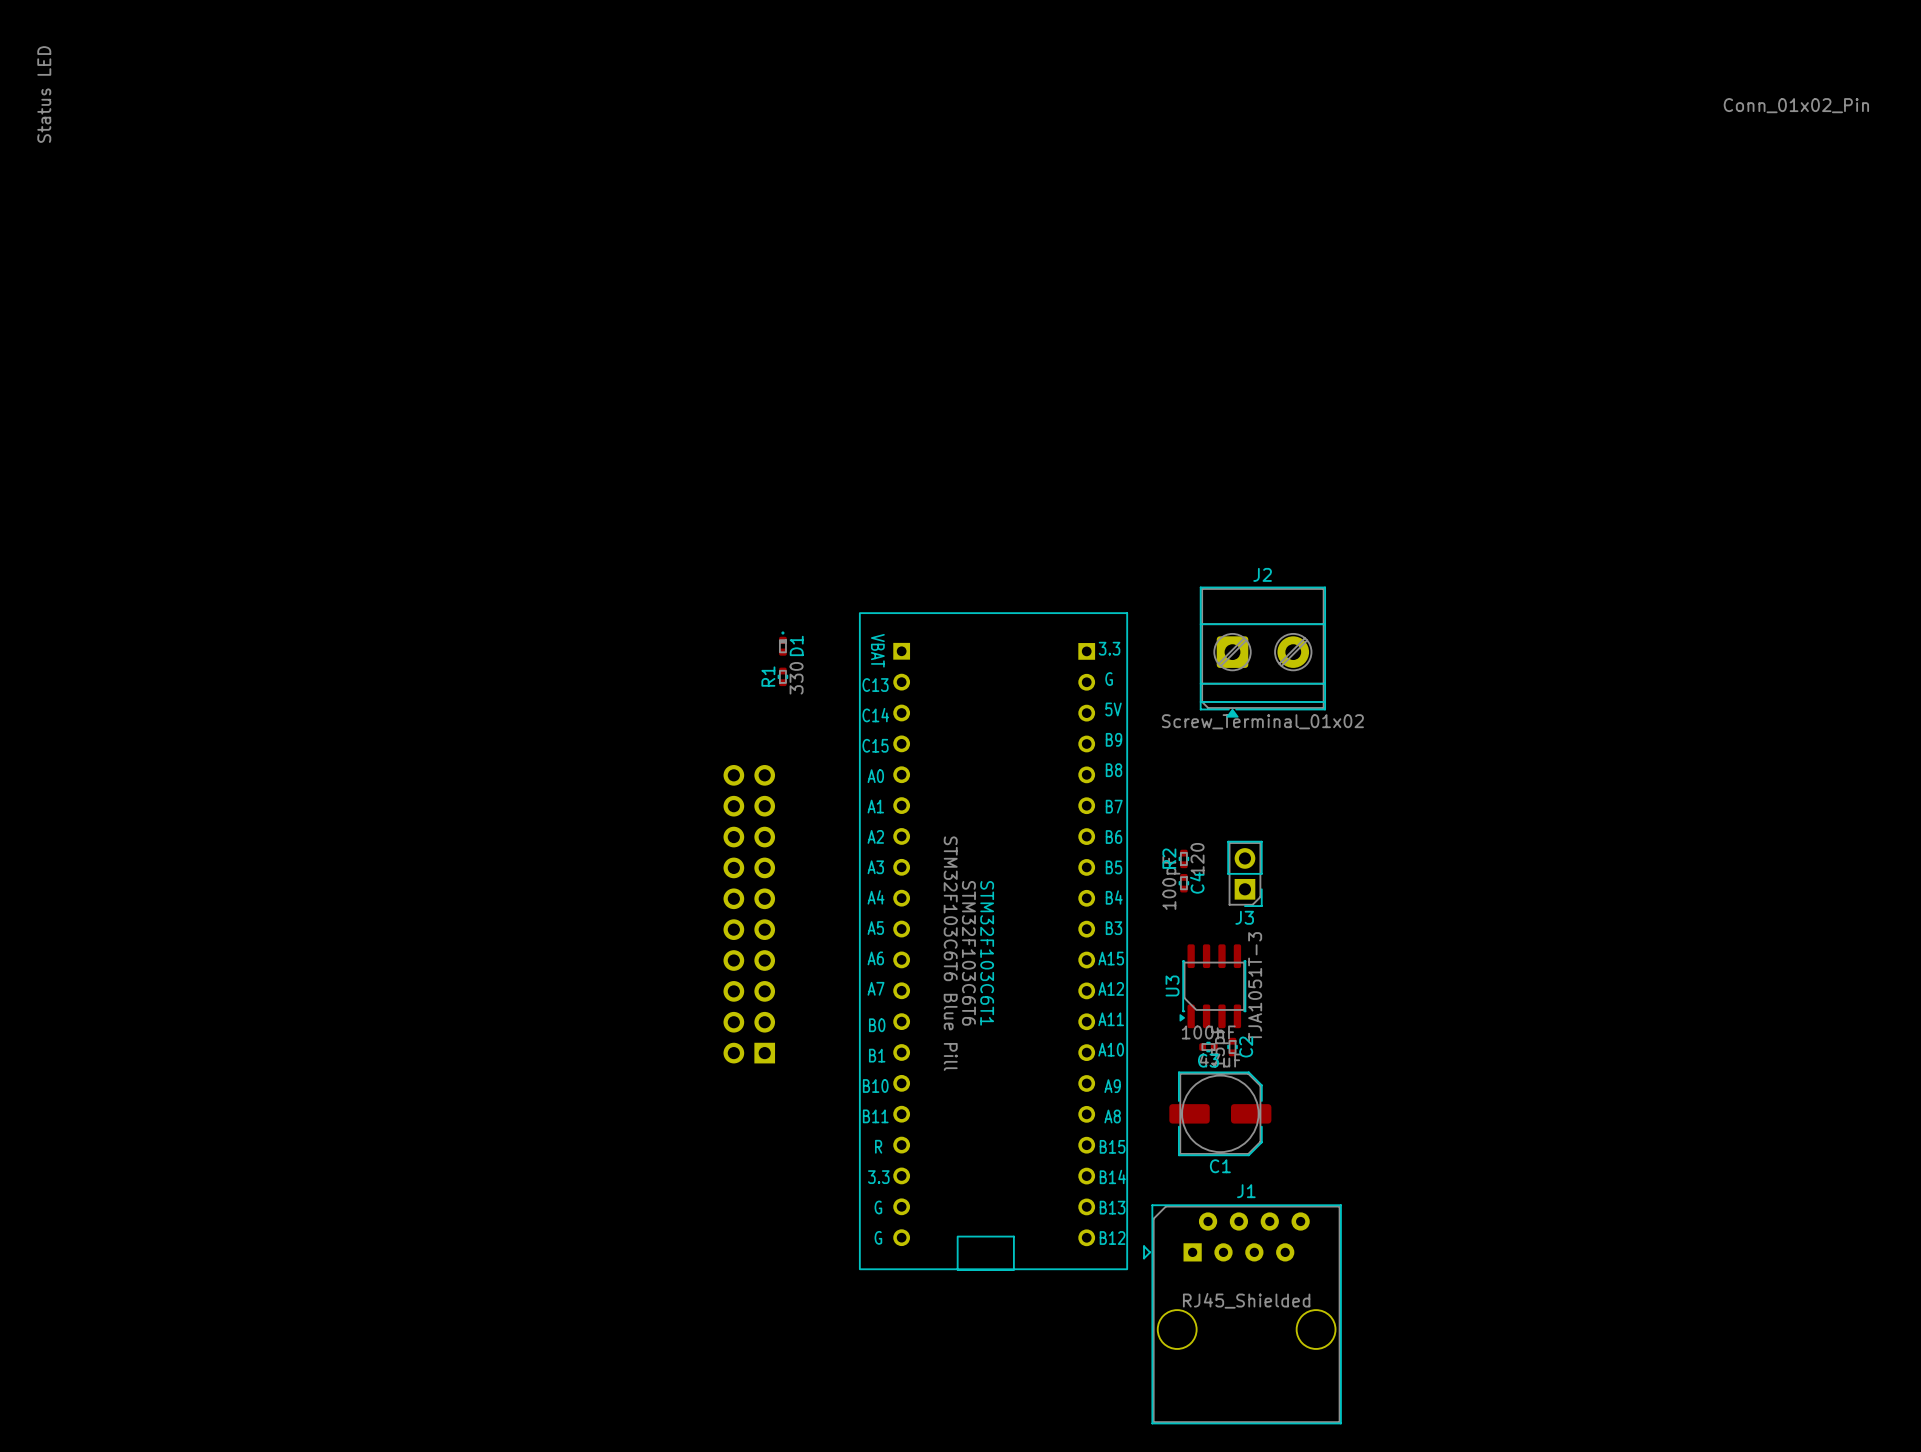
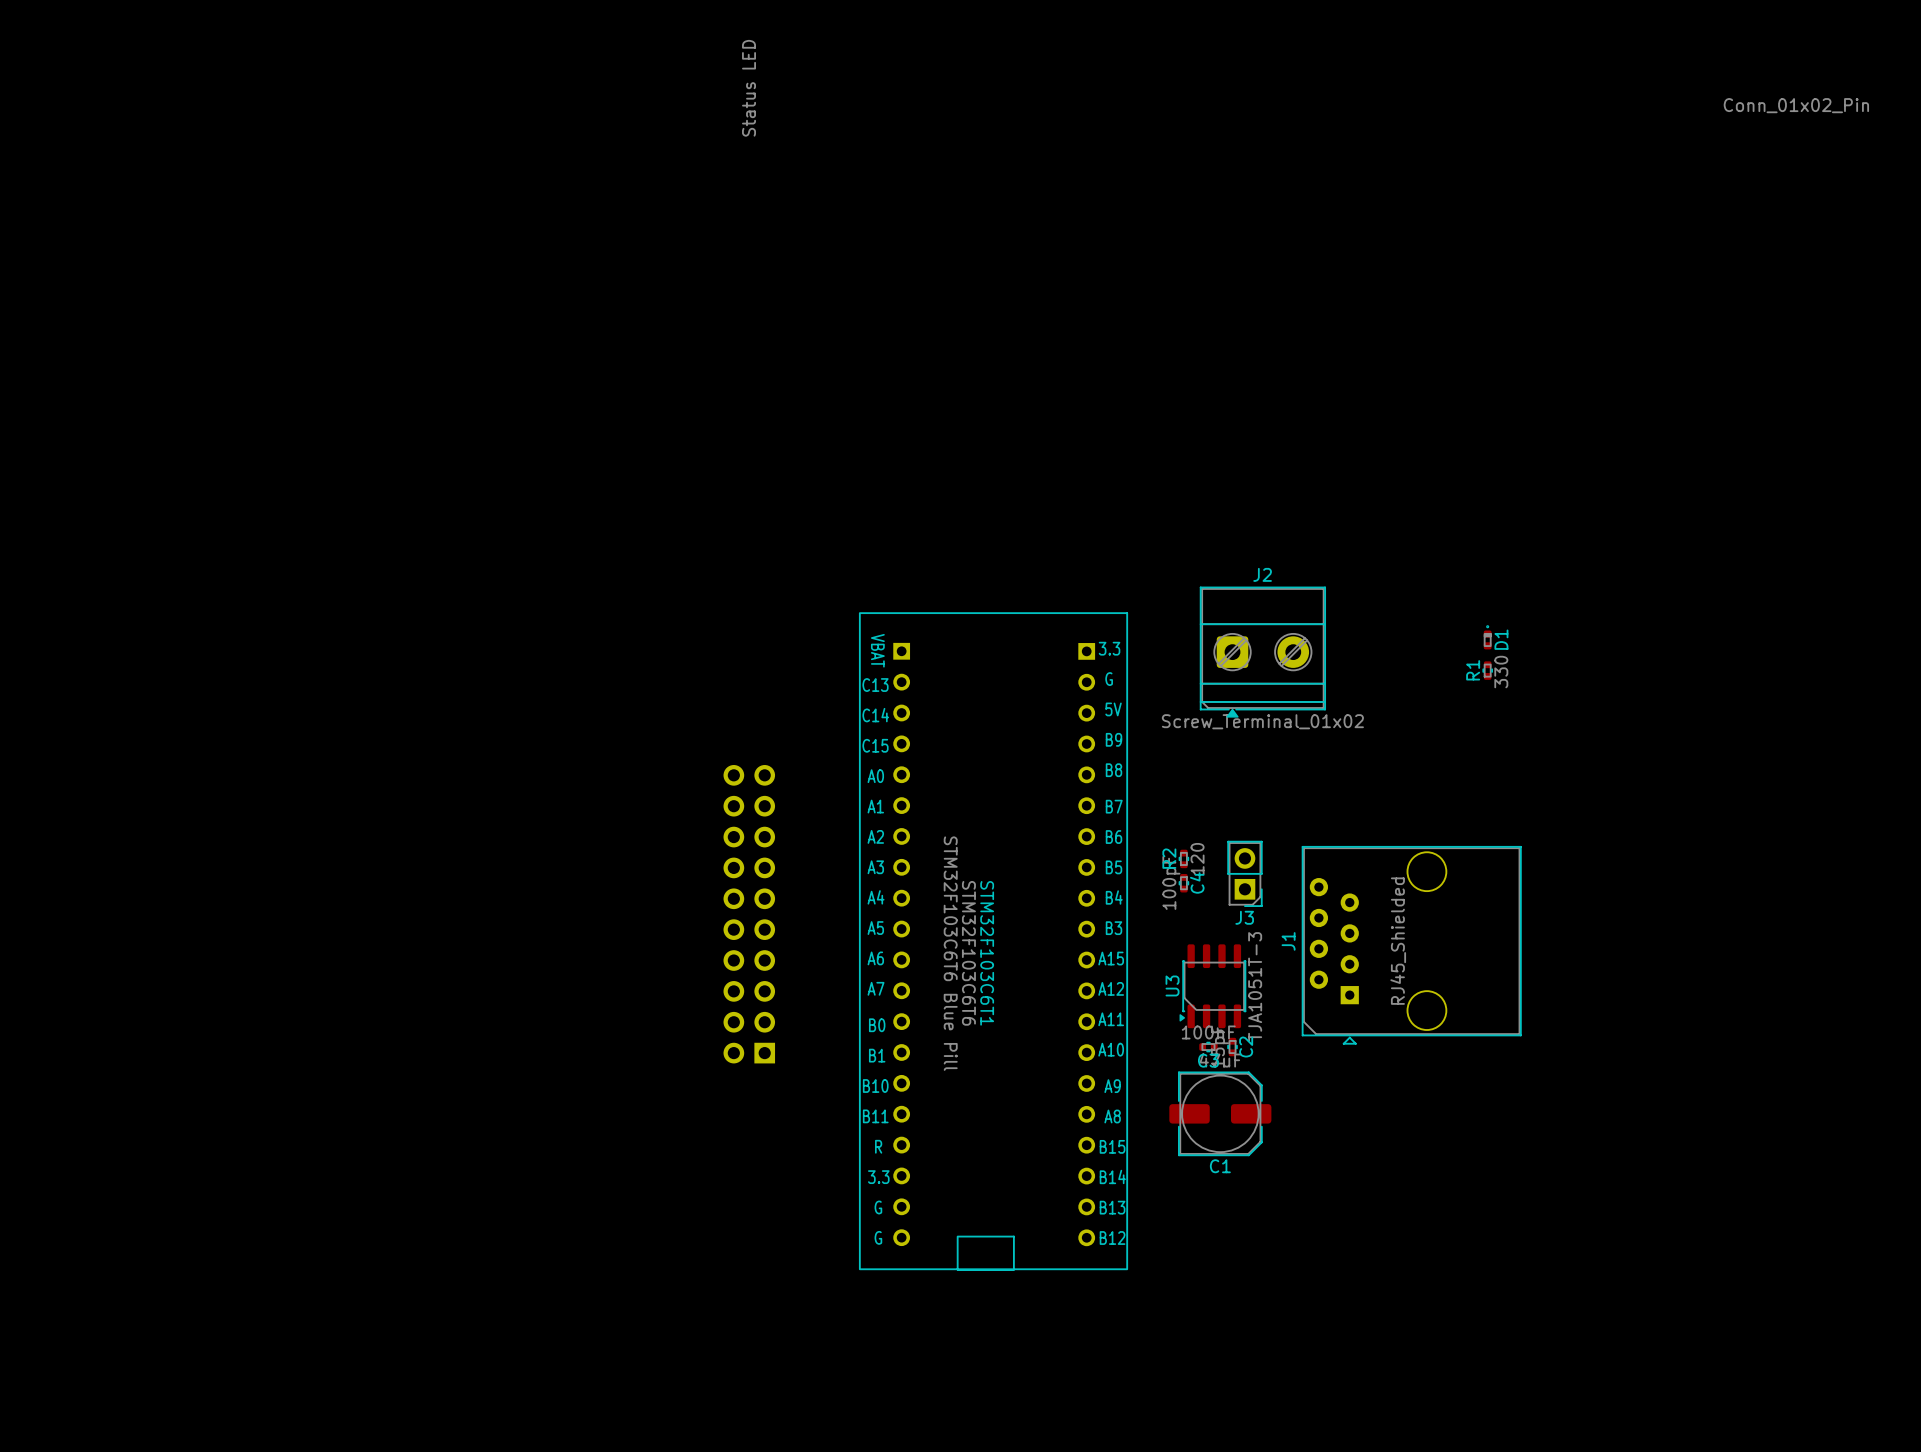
D1 position: (782, 643) -> (1487, 637)
R1 position: (782, 676) -> (1487, 670)
J1 rotation: 0° (1242, 1314) -> 90° counterclockwise (1411, 945)
J1 position: (1242, 1314) -> (1411, 945)

